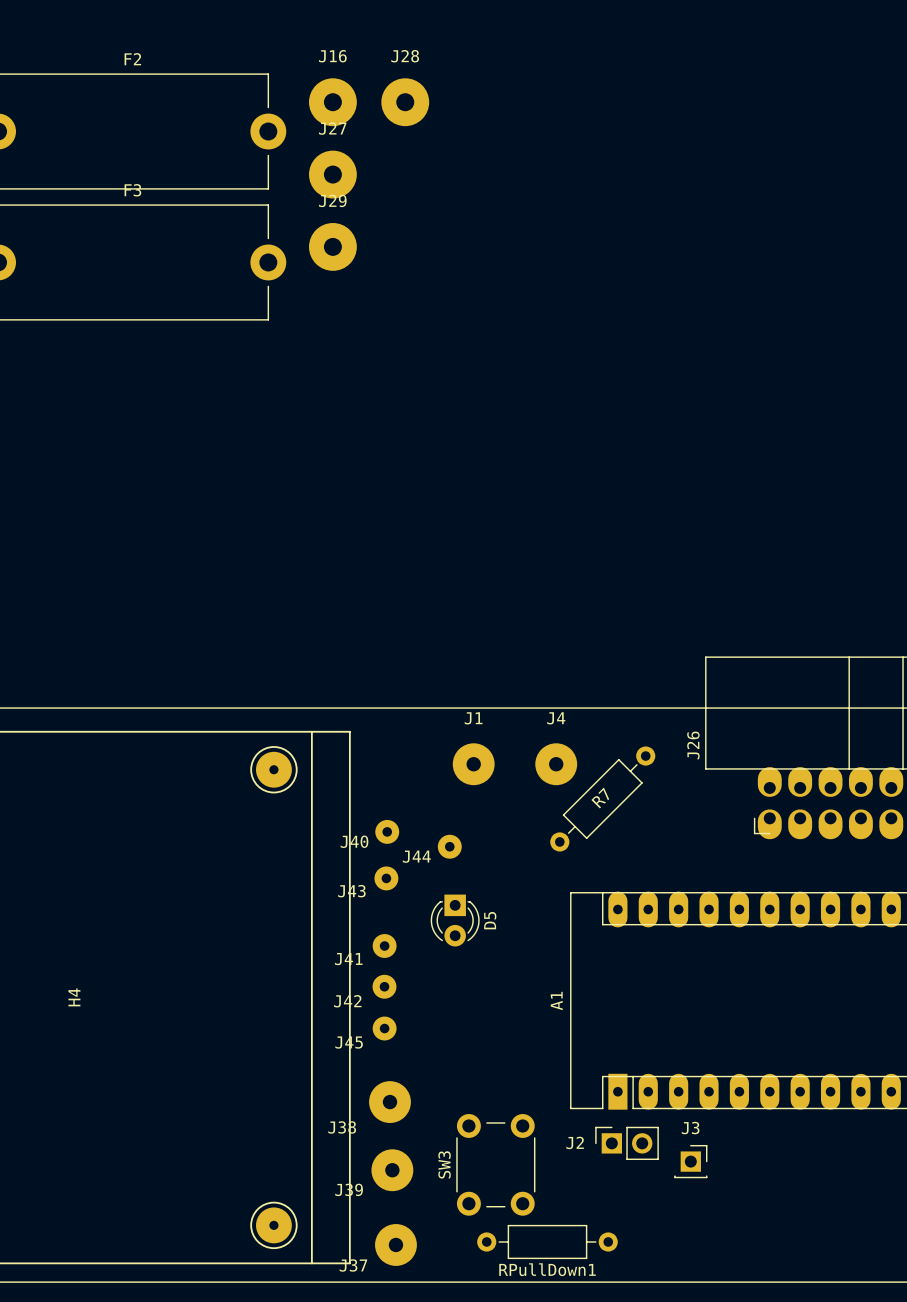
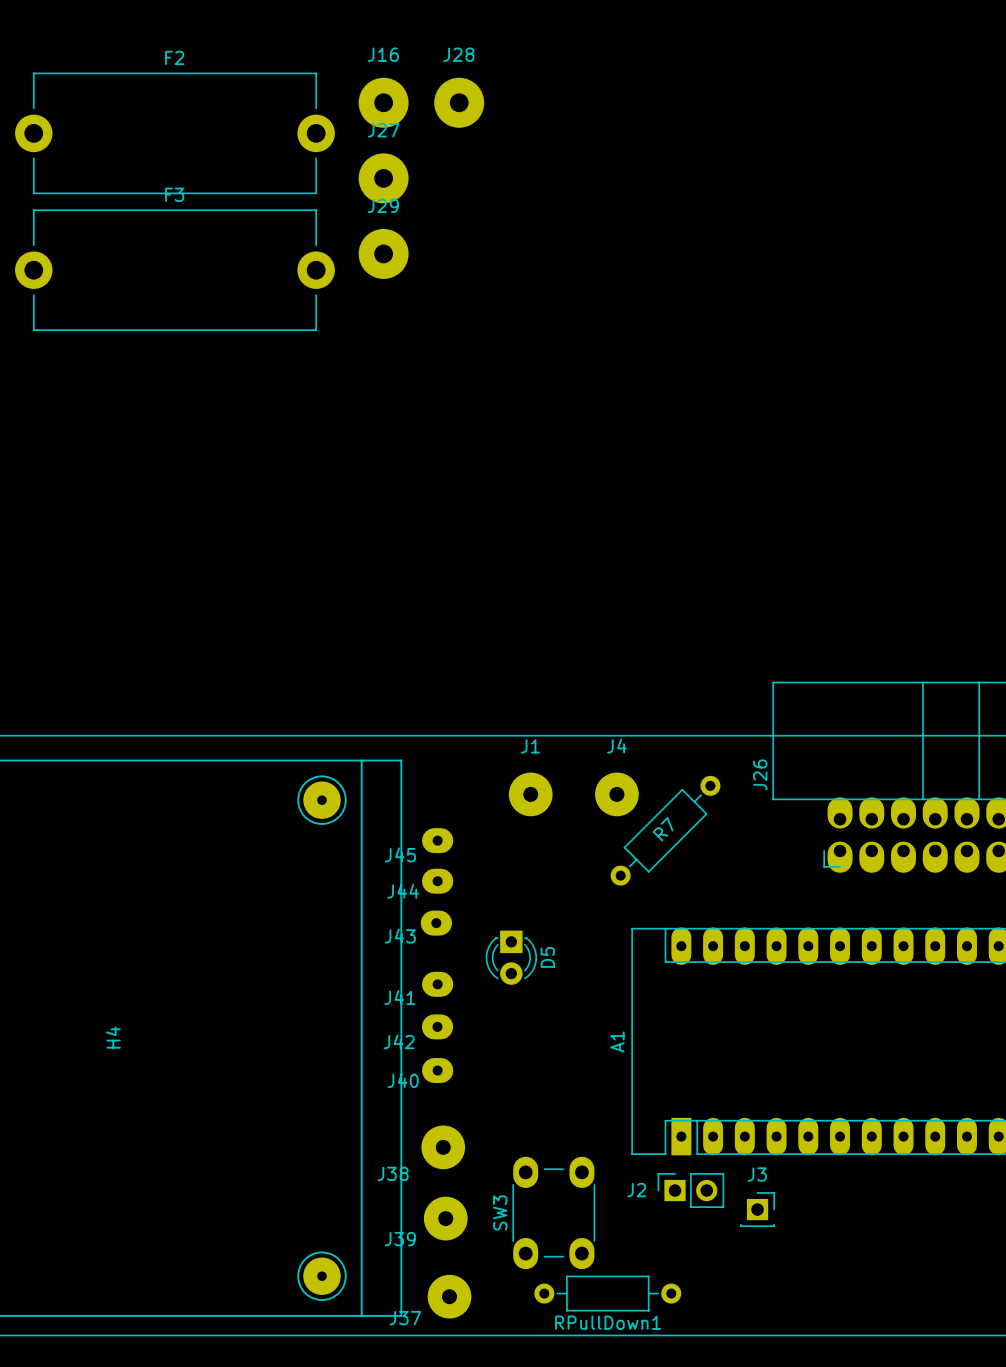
J40 footprint: [375, 819, 400, 844] -> [422, 1058, 454, 1084]
J44 footprint: [437, 834, 462, 859] -> [422, 868, 454, 894]
J43 footprint: [374, 866, 399, 891] -> [420, 910, 453, 936]
J41 footprint: [372, 934, 397, 958] -> [422, 971, 454, 997]
J42 footprint: [372, 974, 397, 999] -> [421, 1014, 454, 1040]
J45 footprint: [372, 1016, 397, 1041] -> [422, 828, 454, 854]
SW3 footprint: [456, 1114, 536, 1216] -> [512, 1156, 596, 1270]

